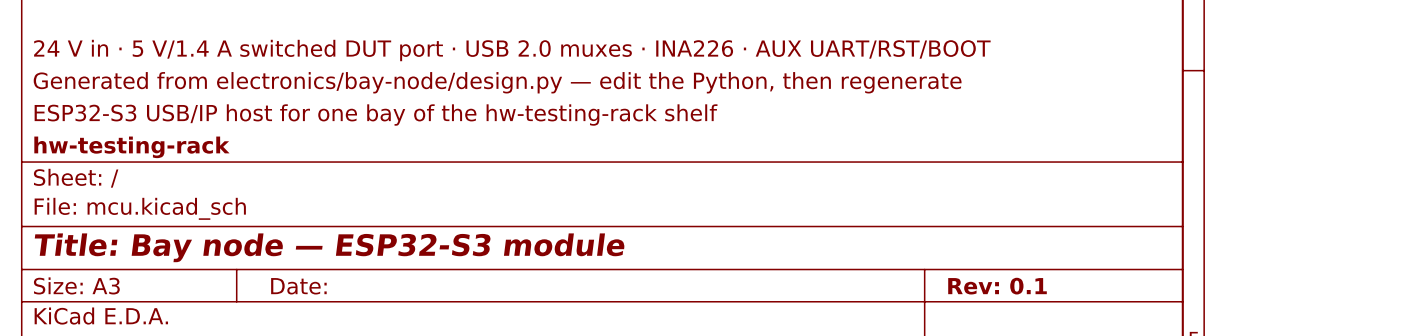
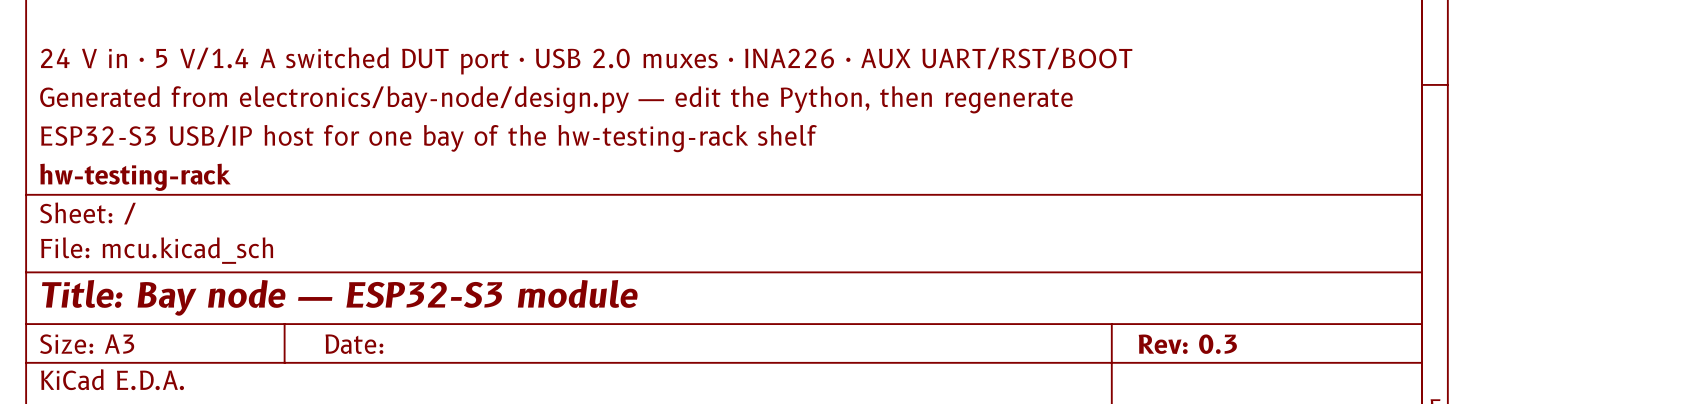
title block: Rev: 0.1 (997, 286) -> Rev: 0.3 (1187, 344)

